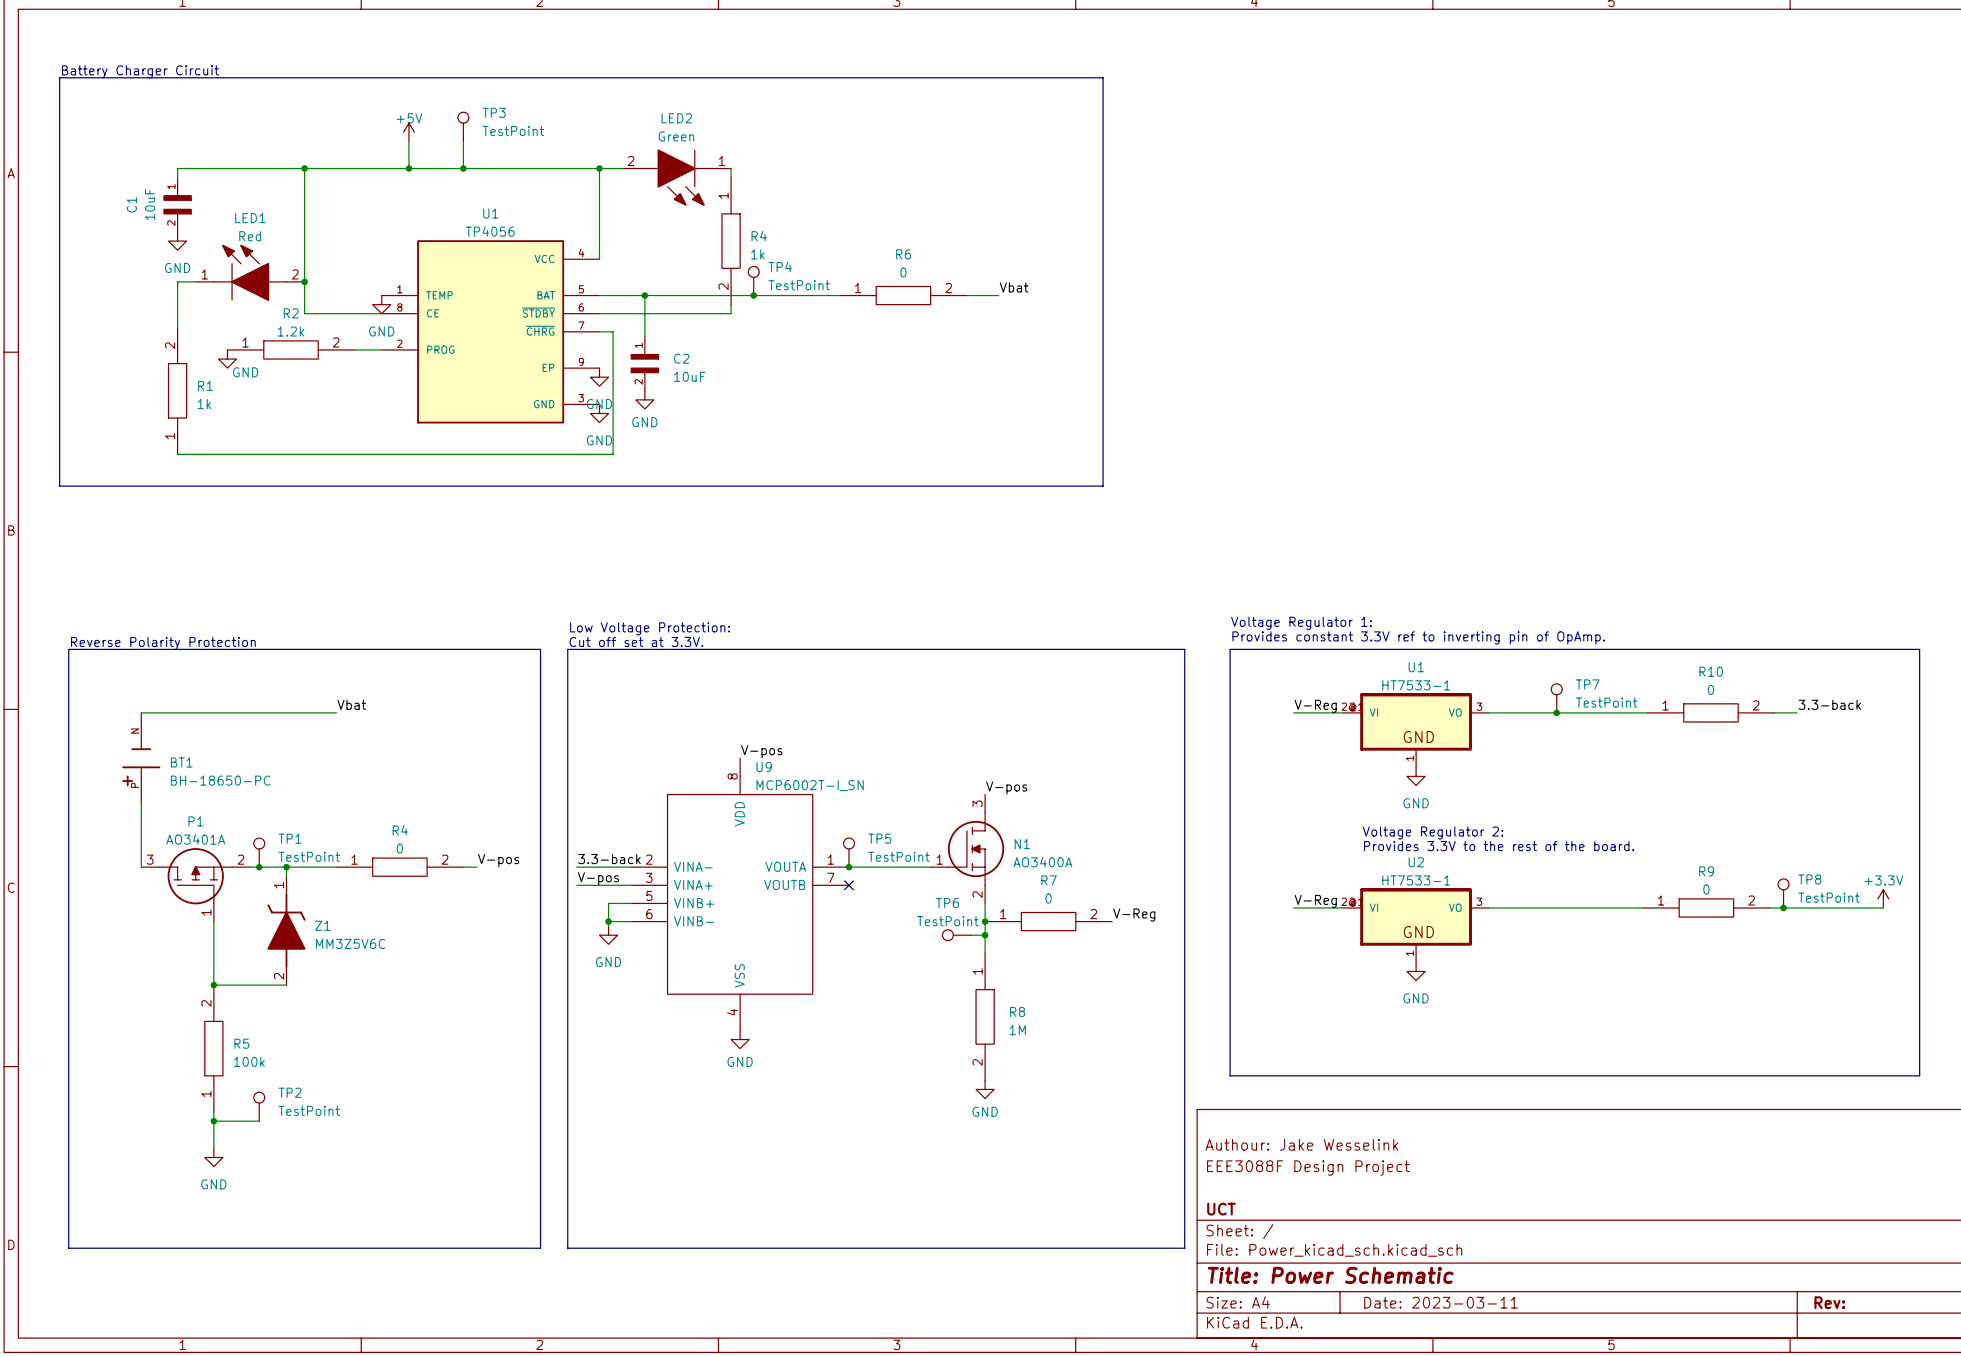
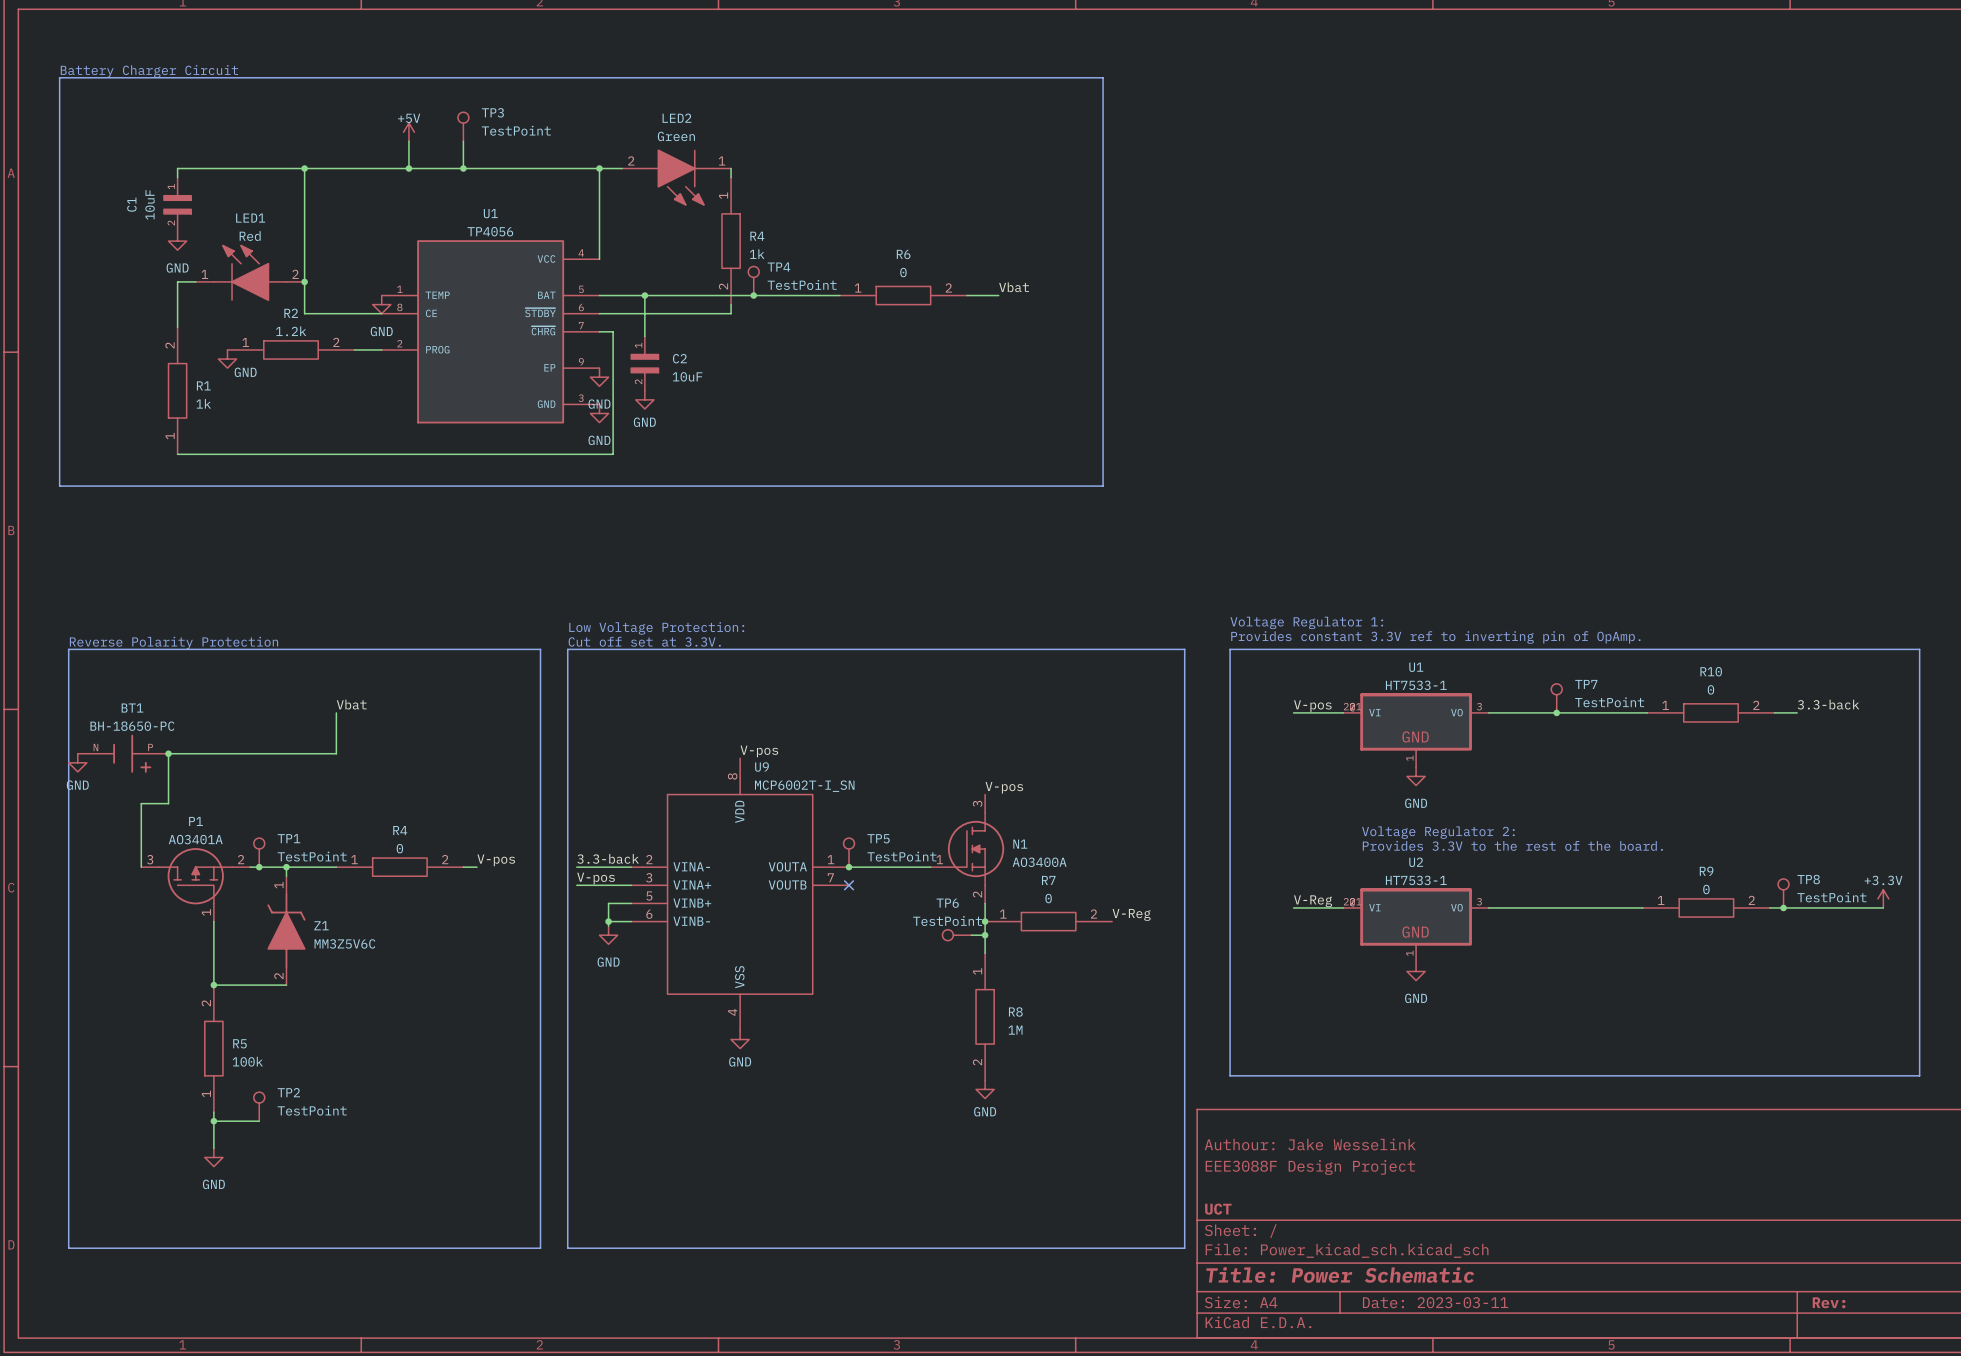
label: V-Reg (1315, 706) -> V-pos (1312, 706)
wire: (141, 712) (336, 712) -> (141, 803) (168, 803) (168, 753) (336, 753) (336, 712)
junction: none -> (168, 753)
power symbol: none -> GND (77, 762)
BT1 rotation: 0° (141, 767) -> 90° counterclockwise (132, 753)
BT1 value position: BH-18650-PC (220, 780) -> BH-18650-PC (132, 726)

